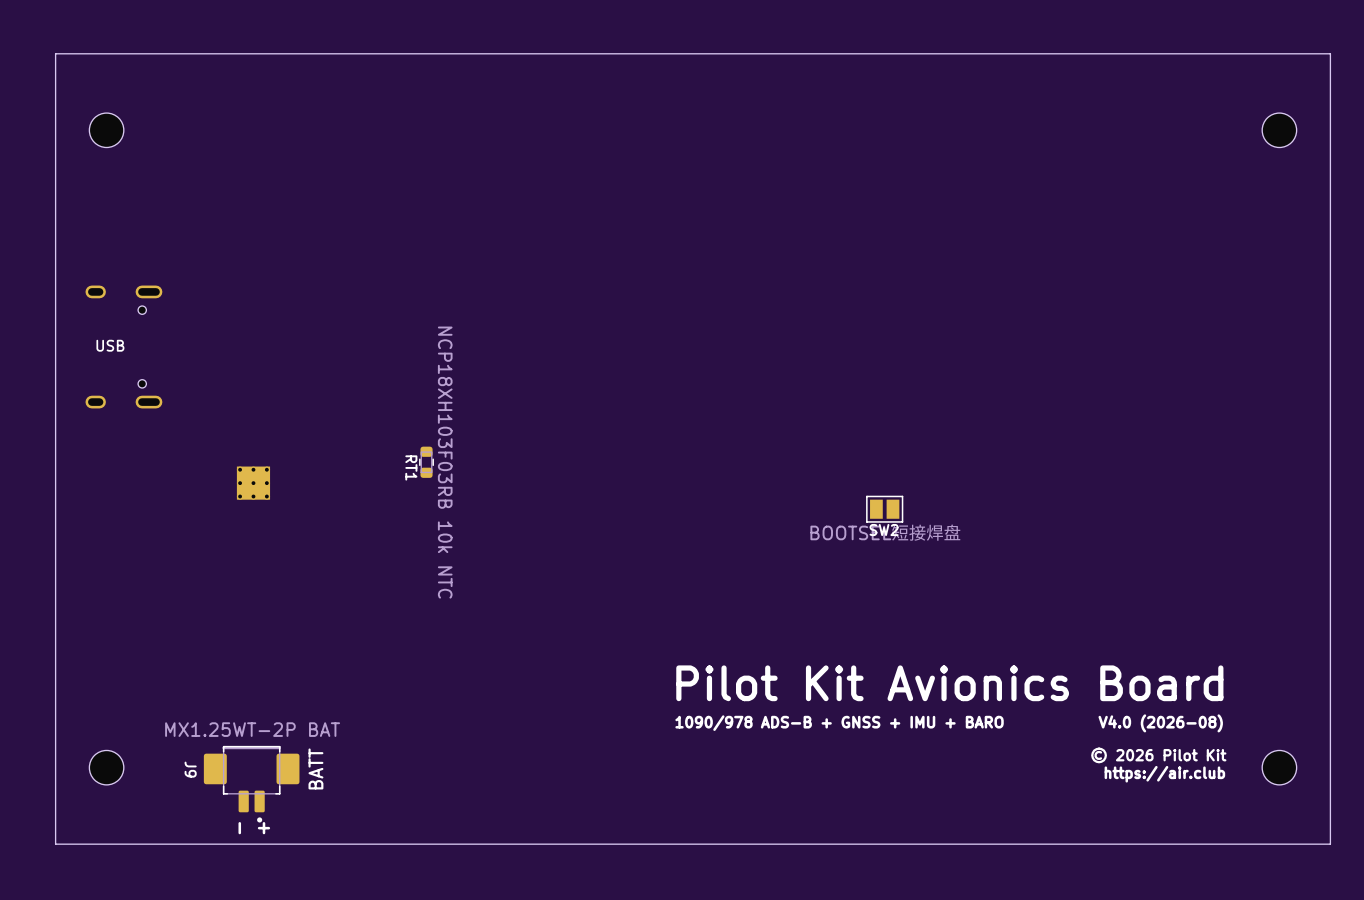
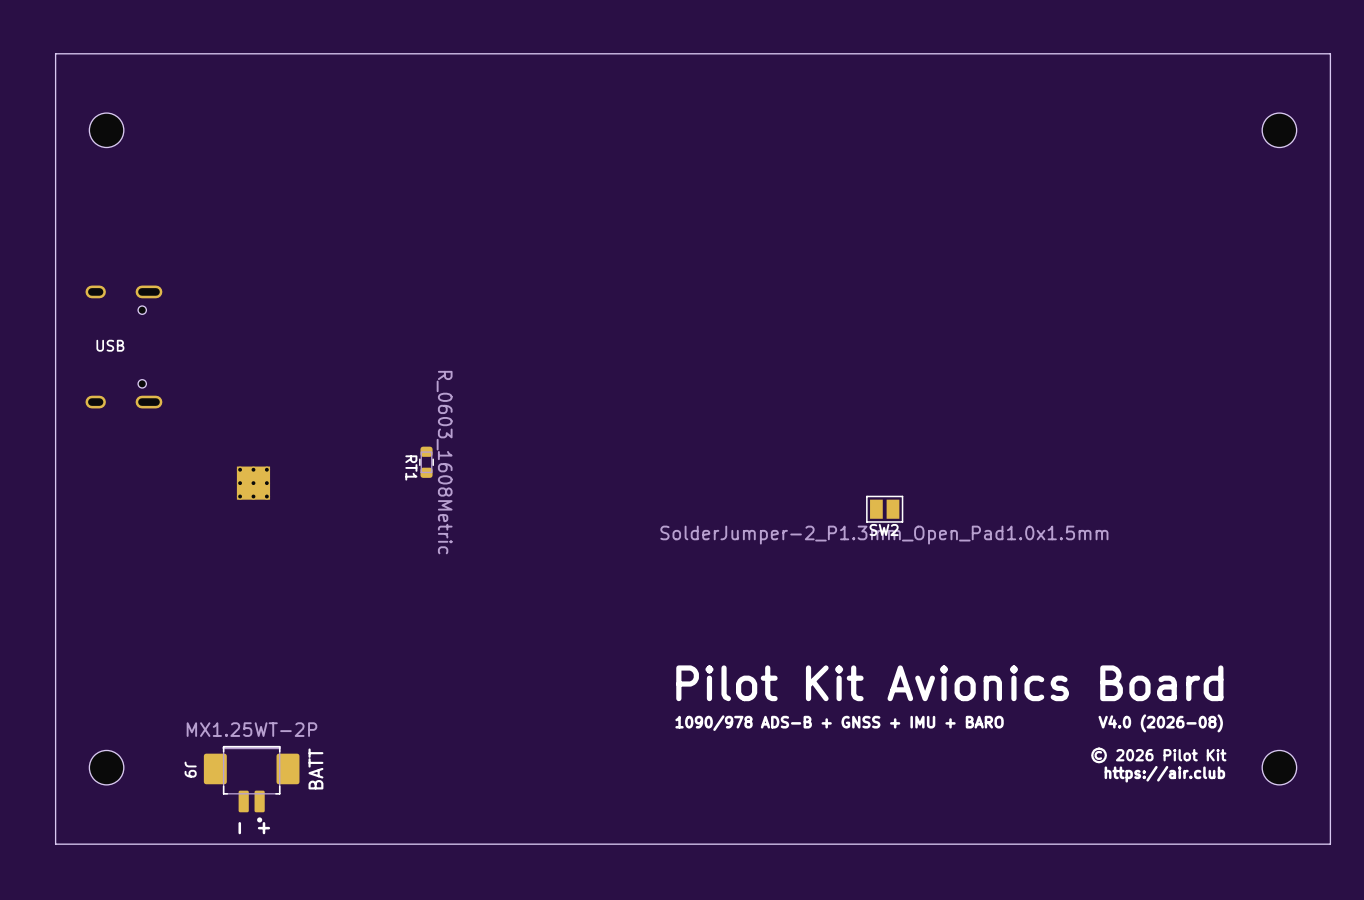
RT1 value: NCP18XH103F03RB 10k NTC (445, 462) -> R_0603_1608Metric (444, 462)
SW2 value: BOOTSEL短接焊盘 (885, 532) -> SolderJumper-2_P1.3mm_Open_Pad1.0x1.5mm (884, 535)
J9 value: MX1.25WT-2P BAT (252, 729) -> MX1.25WT-2P (251, 729)

